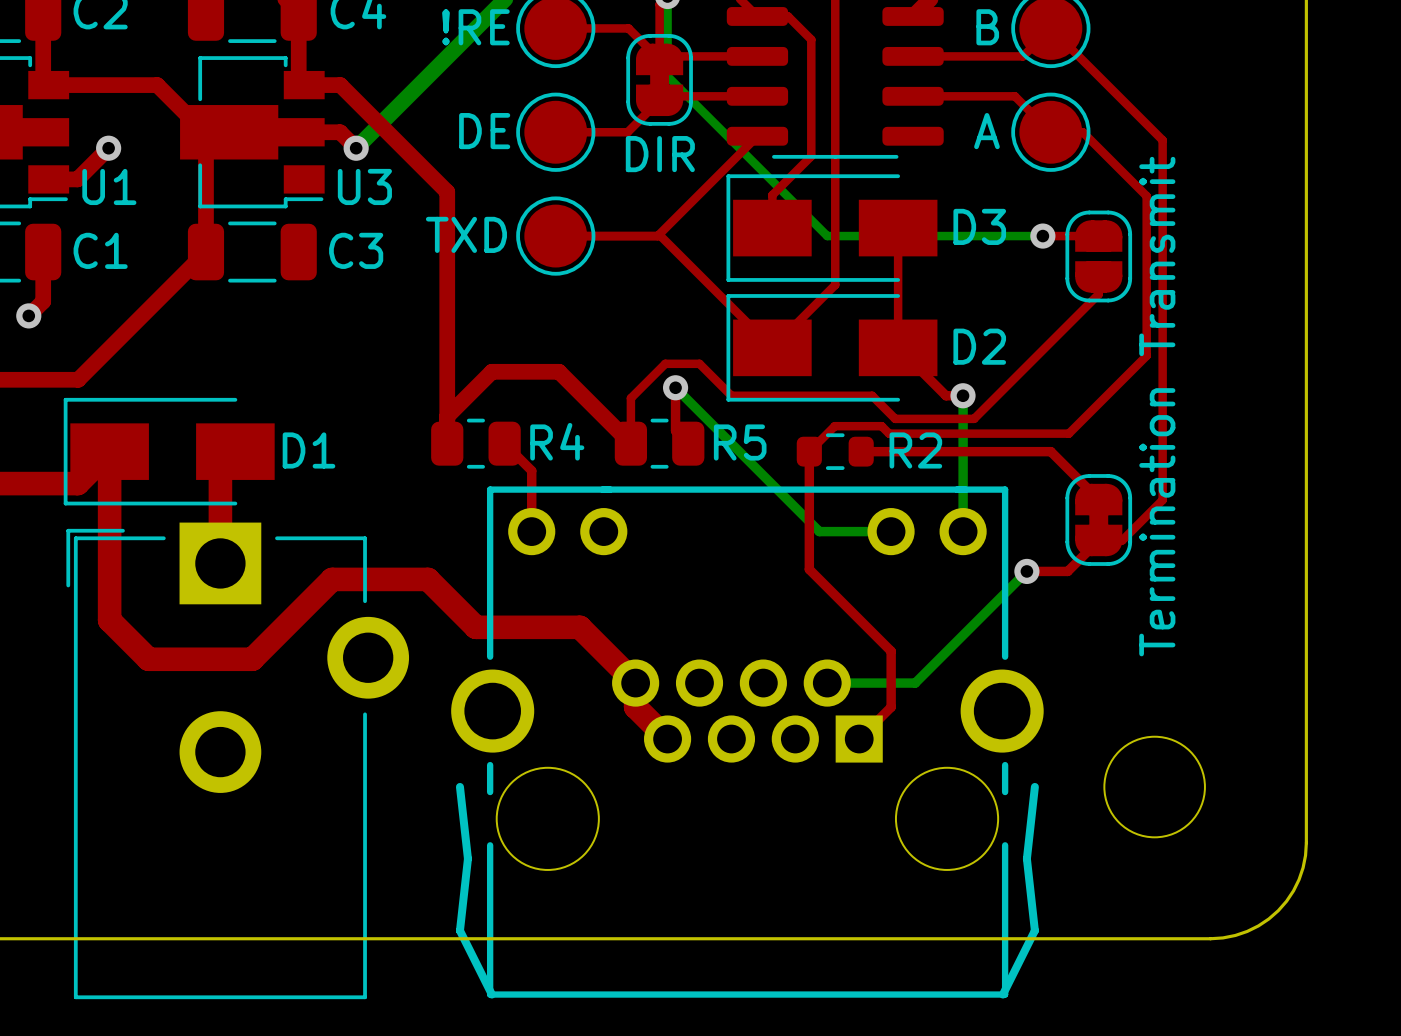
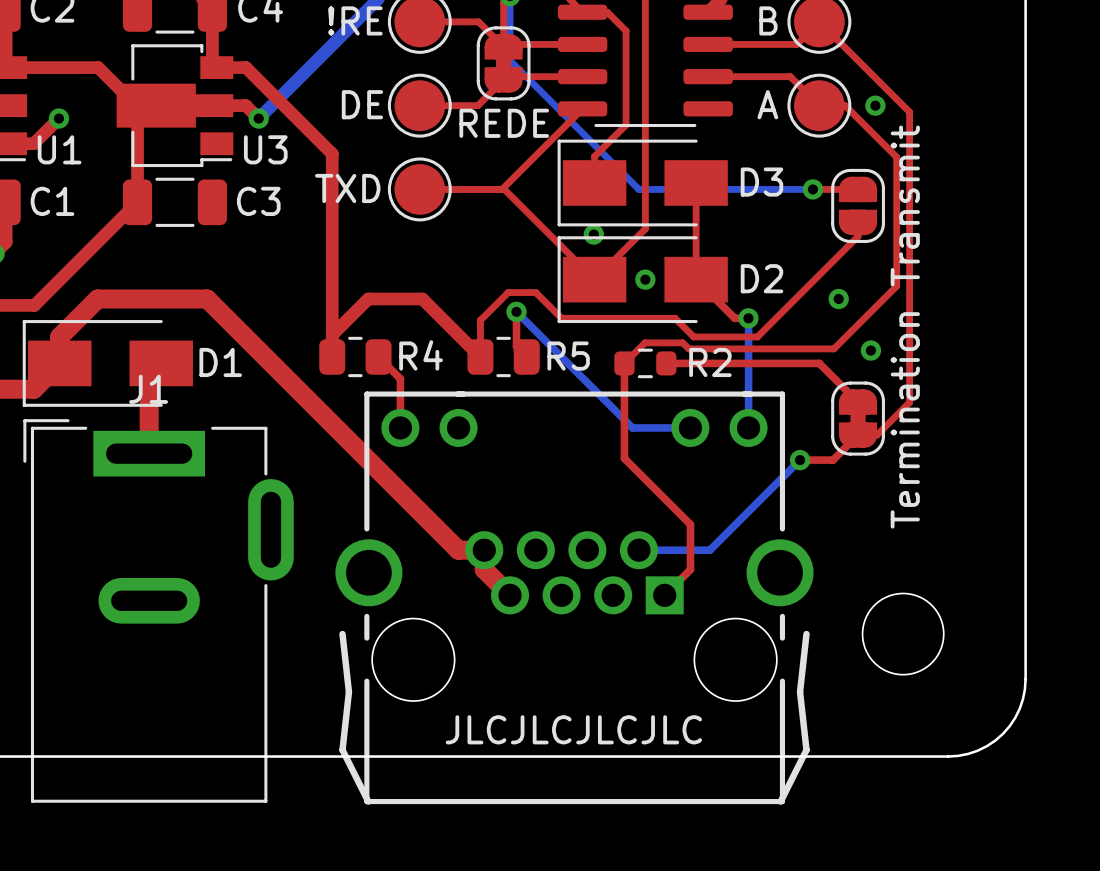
via: none -> (875, 105)
part value: DIR (660, 154) -> REDE (504, 123)
via: none -> (593, 234)
via: none -> (645, 279)
via: none -> (838, 298)
via: none -> (870, 350)
top track: (109, 451) (109, 620) (148, 659) (252, 659) (332, 579) (428, 579) (475, 627) (579, 627) (635, 683) -> (59, 363) (59, 336) (97, 298) (207, 298) (458, 550) (484, 550)
J1: none -> (158, 610)
part: (237, 760) -> none
text: none -> JLCJLCJLCJLC (573, 729)

